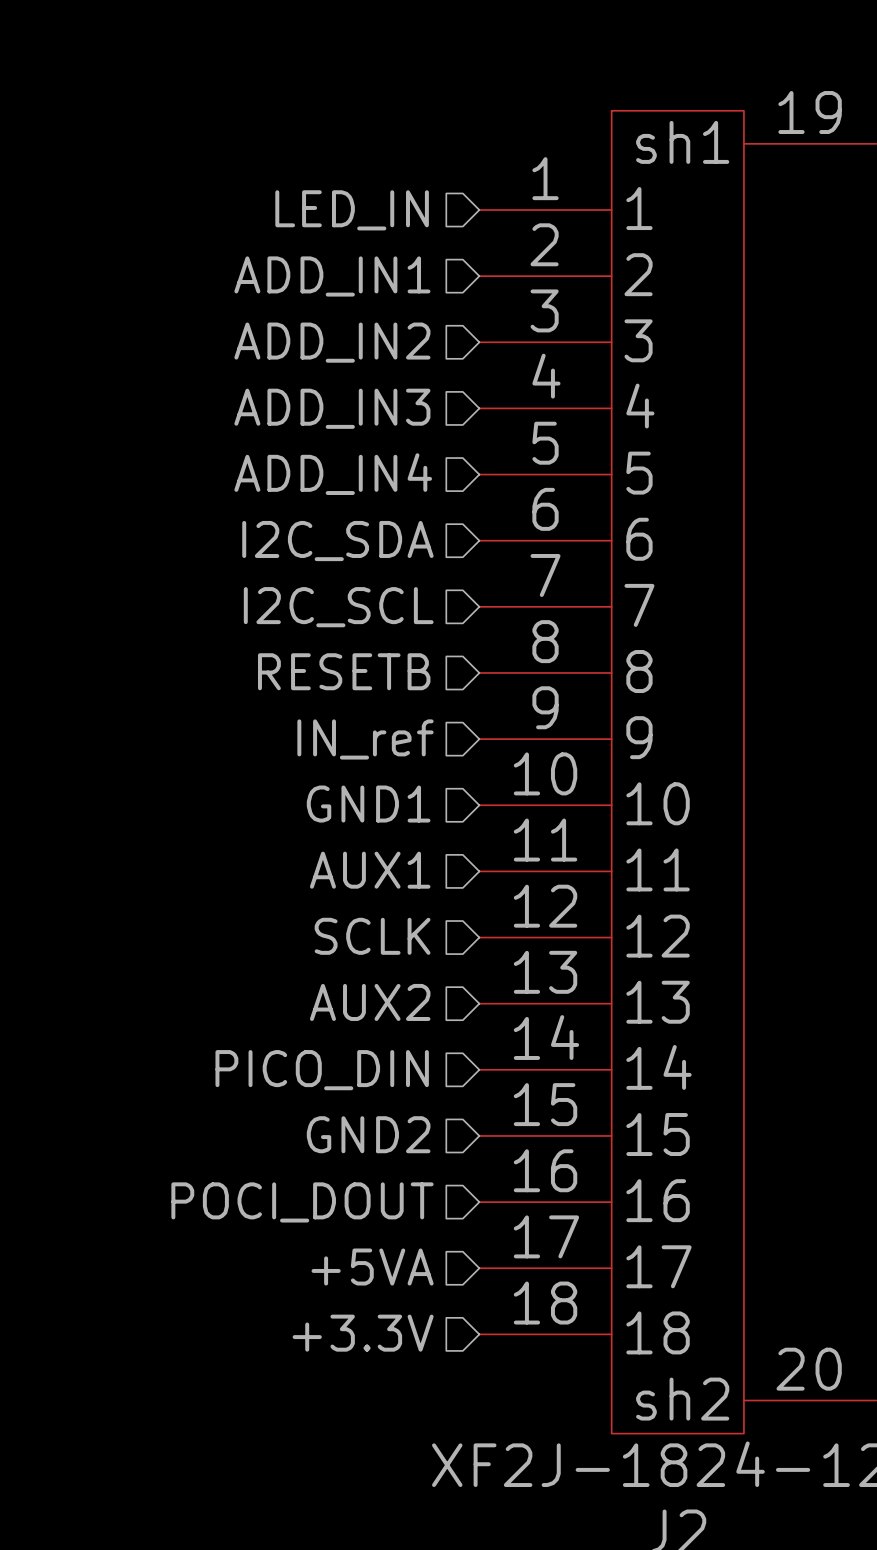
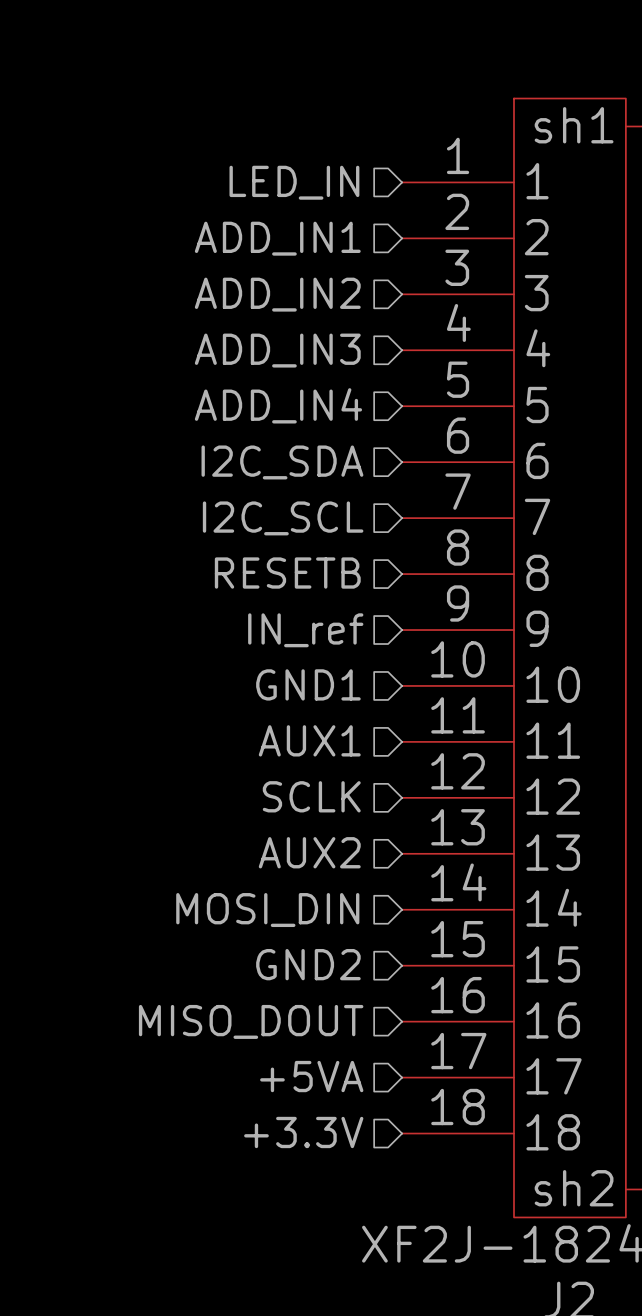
hierarchical label: PICO_DIN (322, 1070) -> MOSI_DIN (267, 910)
hierarchical label: POCI_DOUT (302, 1202) -> MISO_DOUT (251, 1021)

